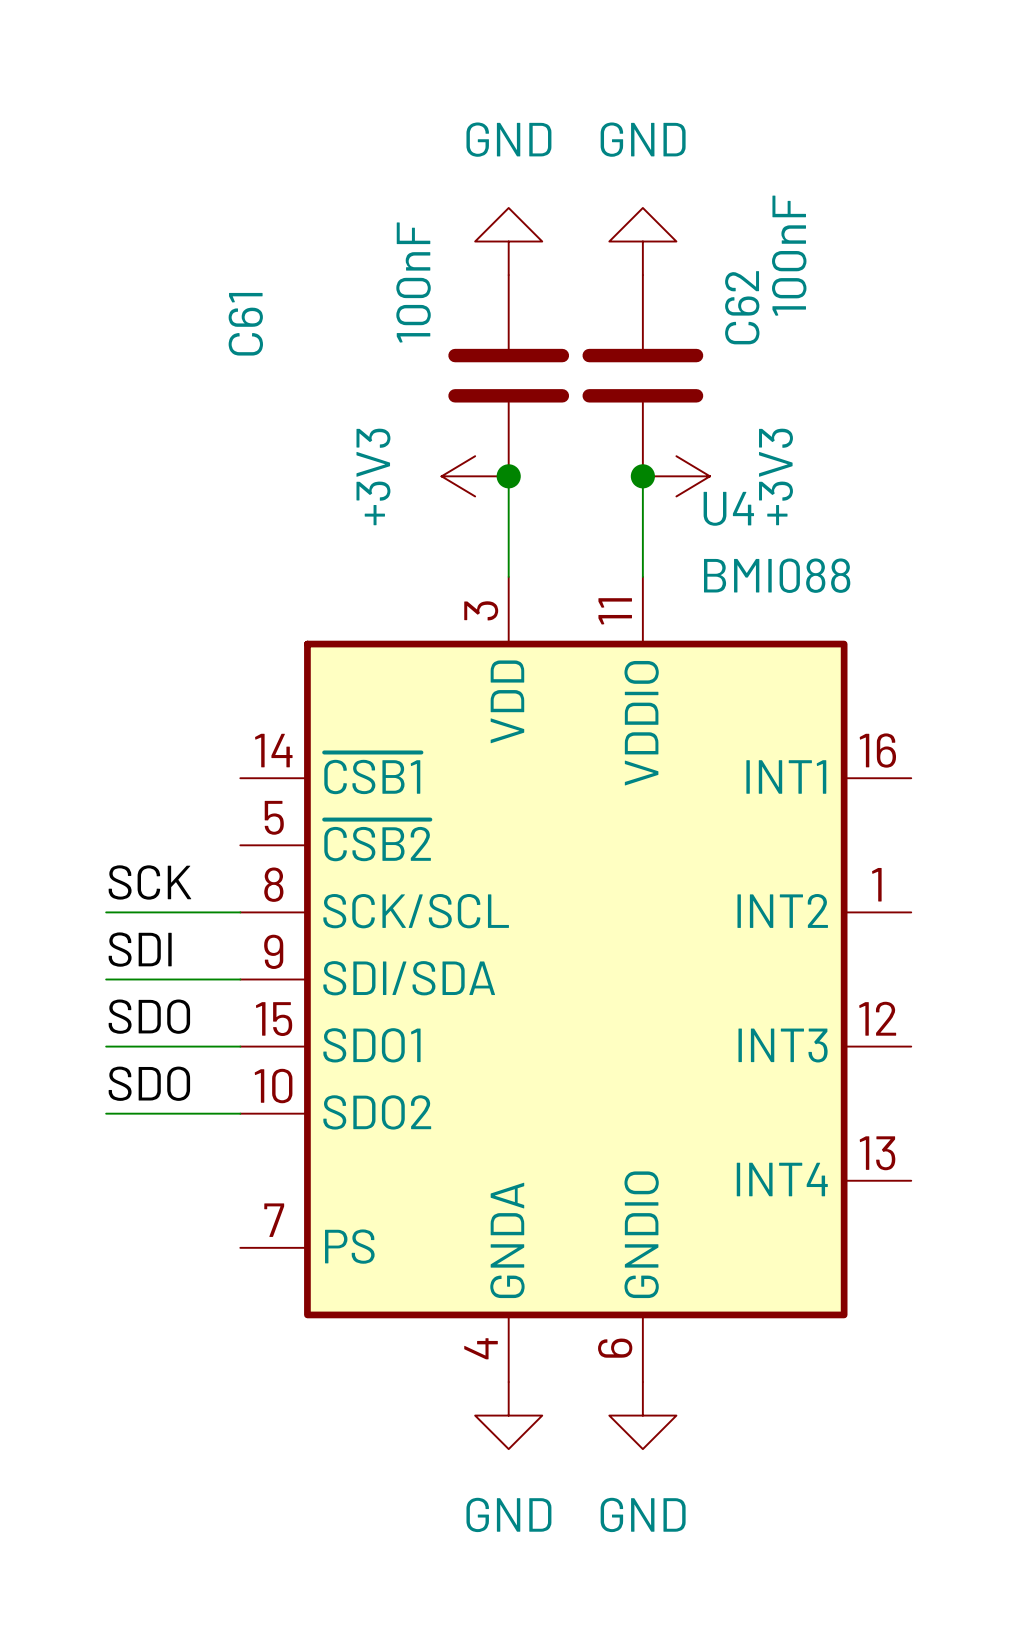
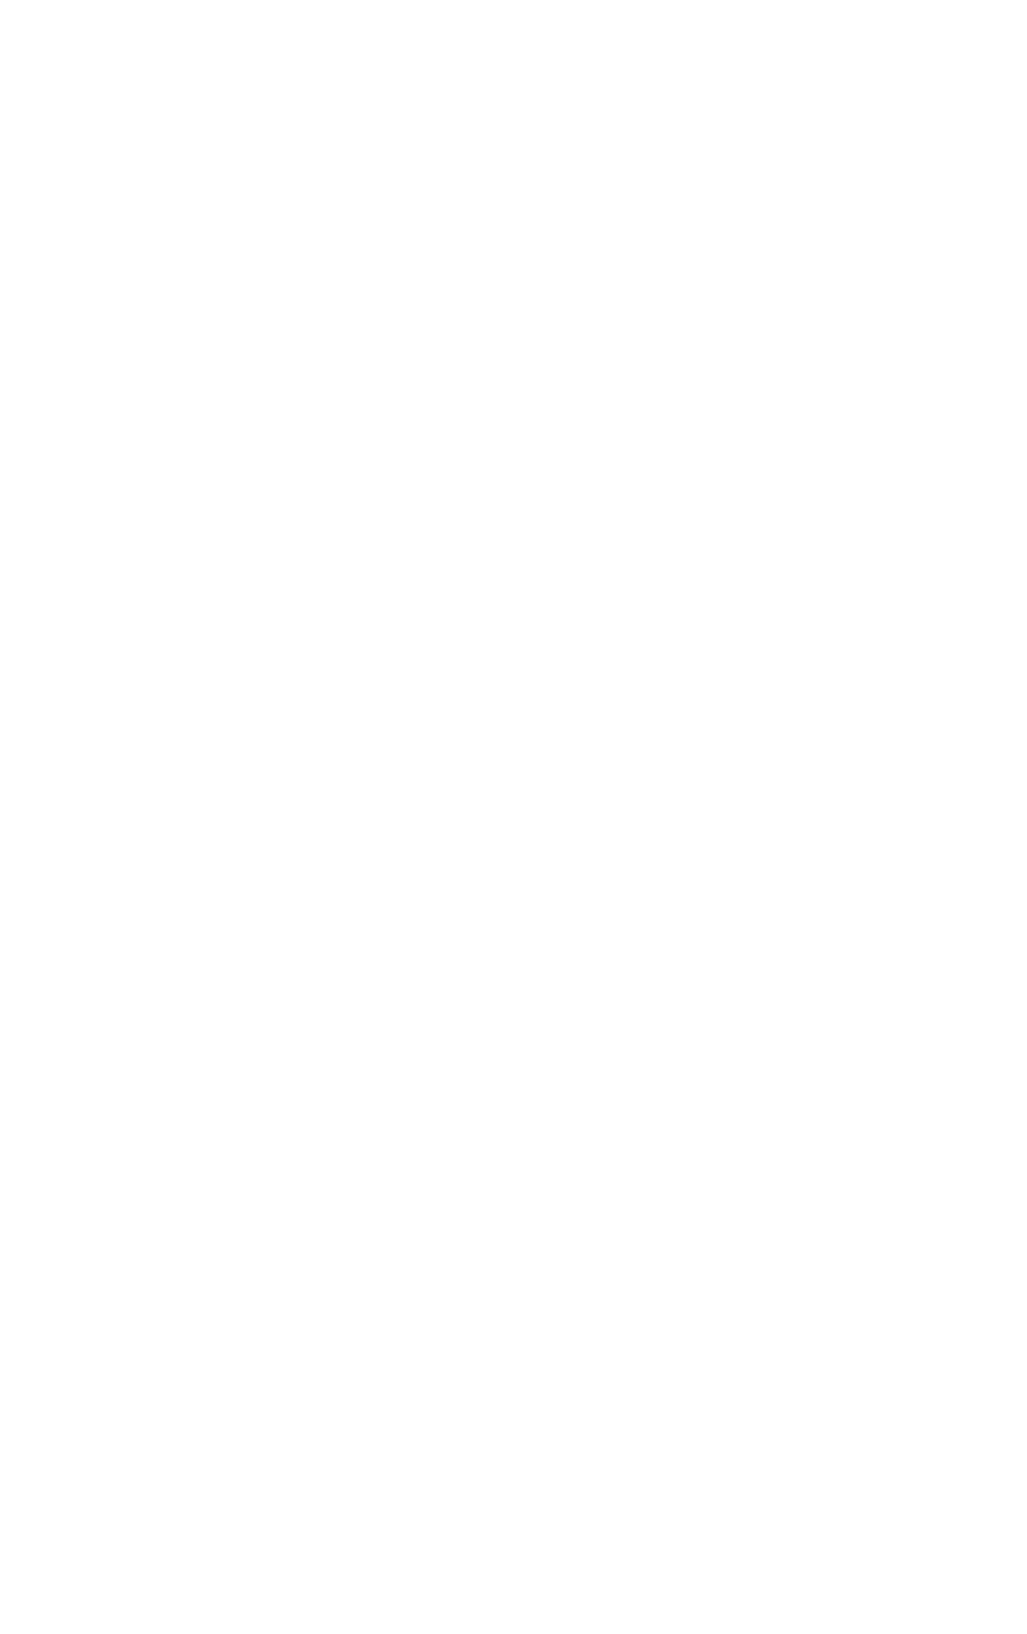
power symbol: GND (508, 241) -> none
power symbol: GND (642, 241) -> none
C61: 100nF (508, 375) -> none
C62: 100nF (642, 375) -> none
power symbol: +3V3 (475, 476) -> none
wire: (508, 476) (508, 576) -> none
junction: (508, 476) -> none
wire: (642, 476) (642, 576) -> none
junction: (642, 476) -> none
power symbol: +3V3 (676, 476) -> none
label: SCK (149, 882) -> none
wire: (106, 912) (240, 912) -> none
label: SDI (140, 949) -> none
wire: (106, 979) (240, 979) -> none
U4: BMI088 (575, 979) -> none
label: SDO (149, 1016) -> none
wire: (106, 1046) (240, 1046) -> none
label: SDO (149, 1083) -> none
wire: (106, 1113) (240, 1113) -> none
power symbol: GND (508, 1415) -> none
power symbol: GND (642, 1415) -> none

